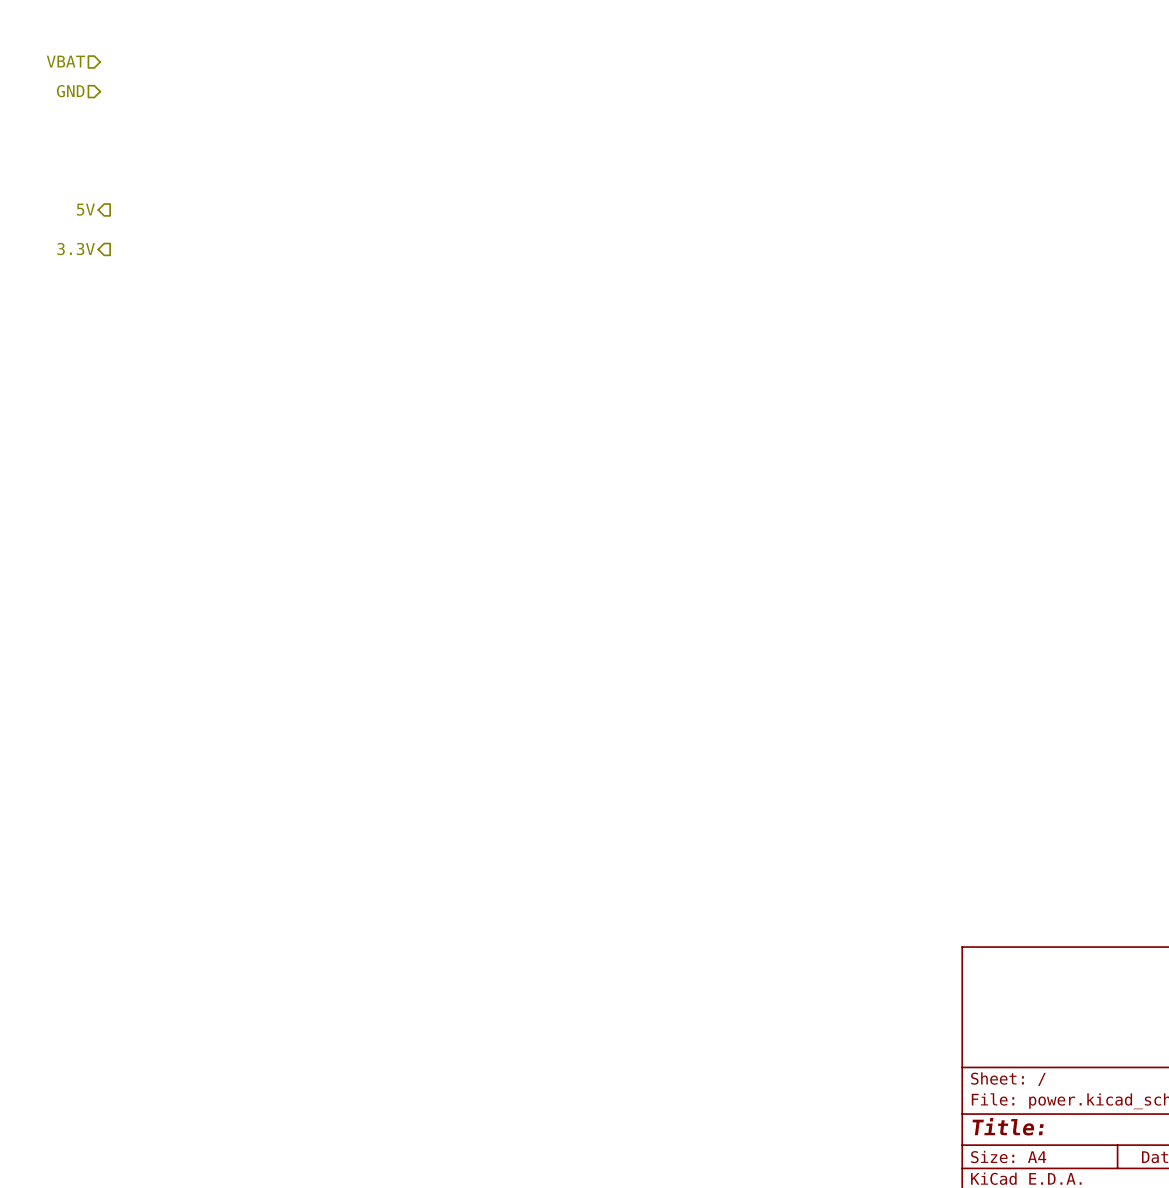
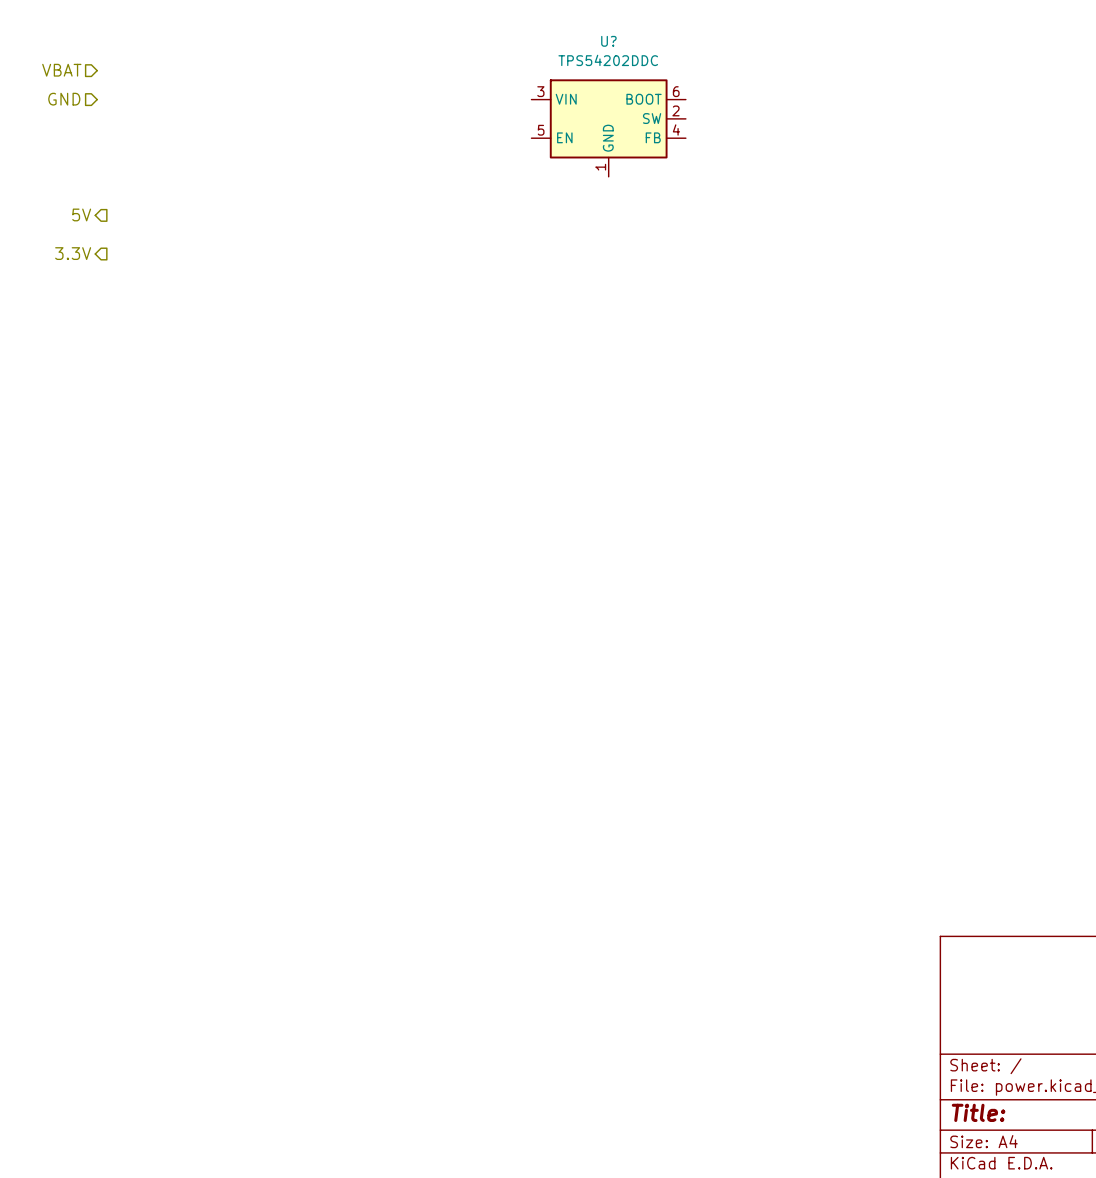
U?: none -> TPS54202DDC (608, 128)

